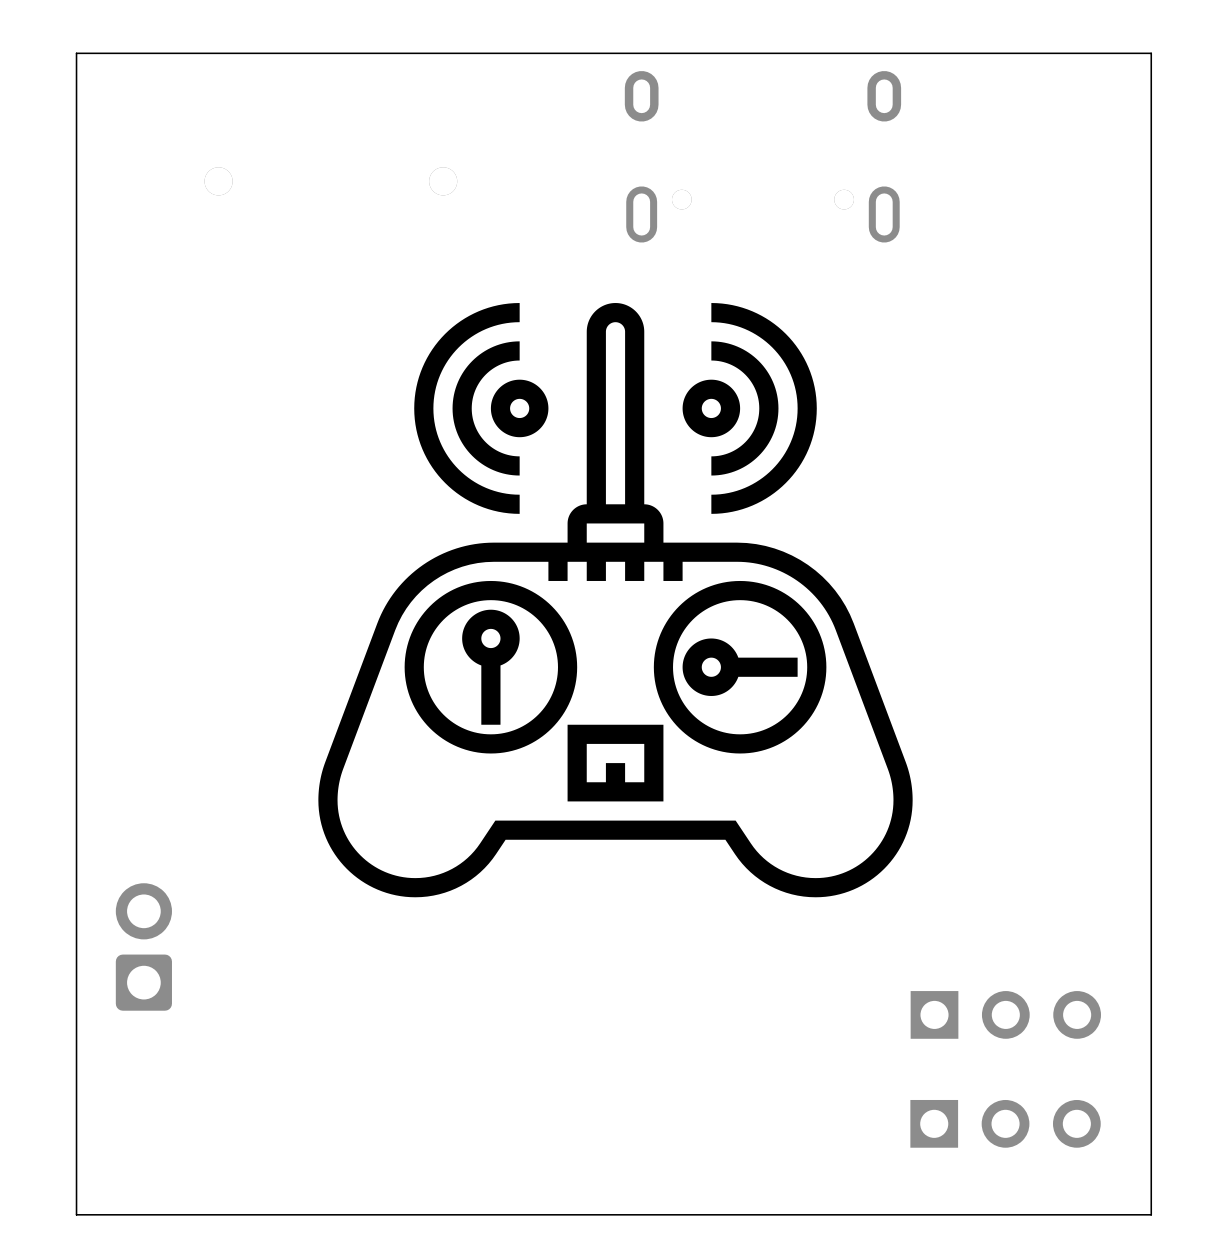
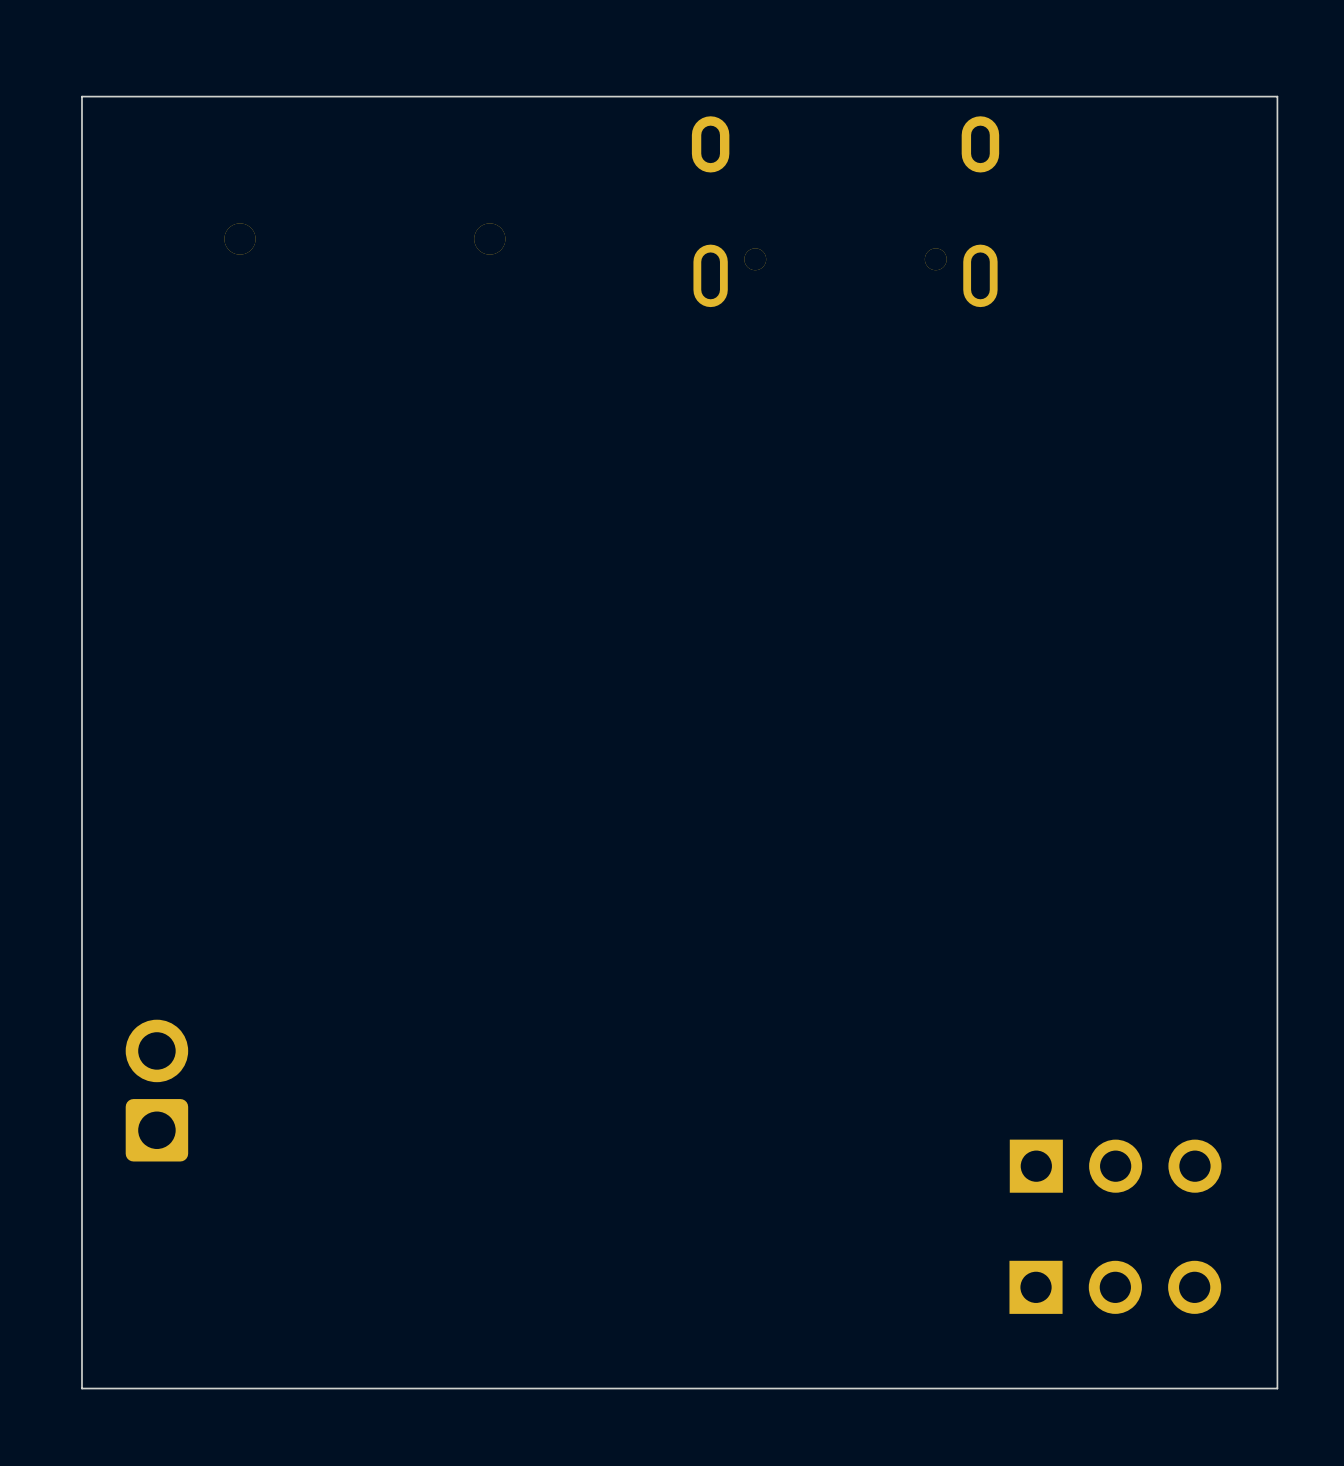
drawing: [318, 303, 913, 898] -> none

